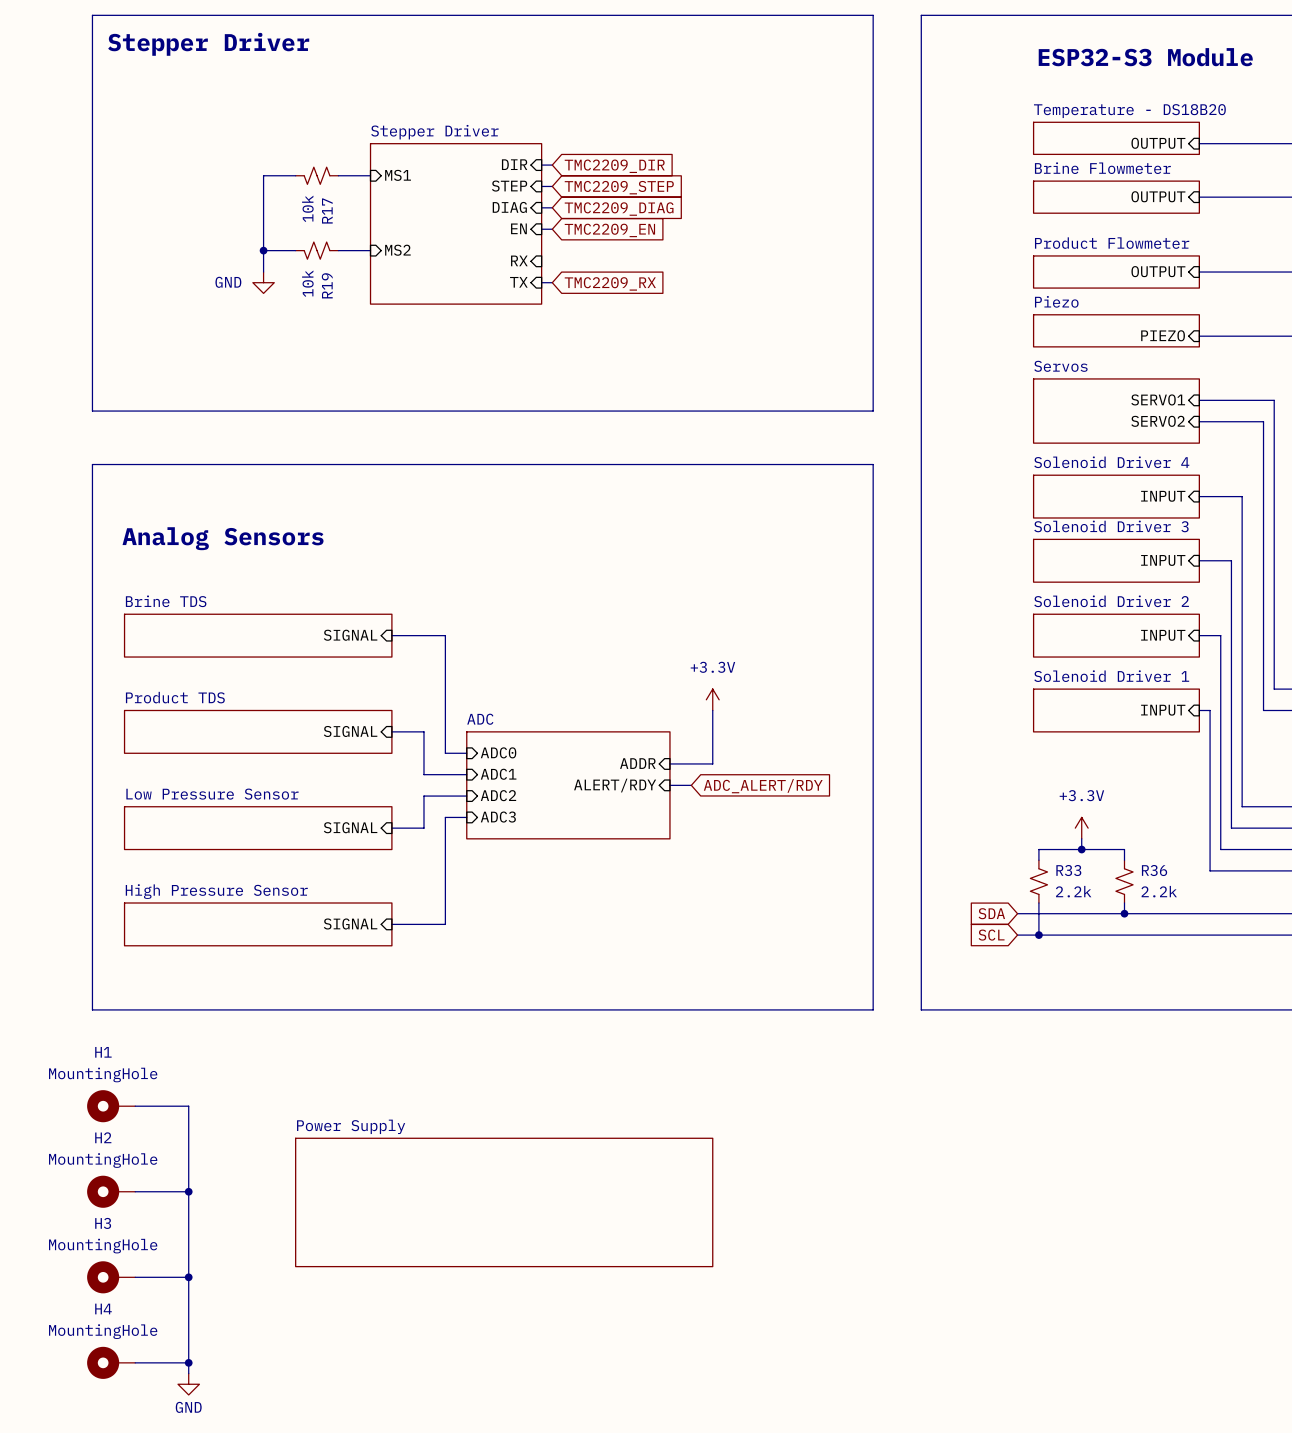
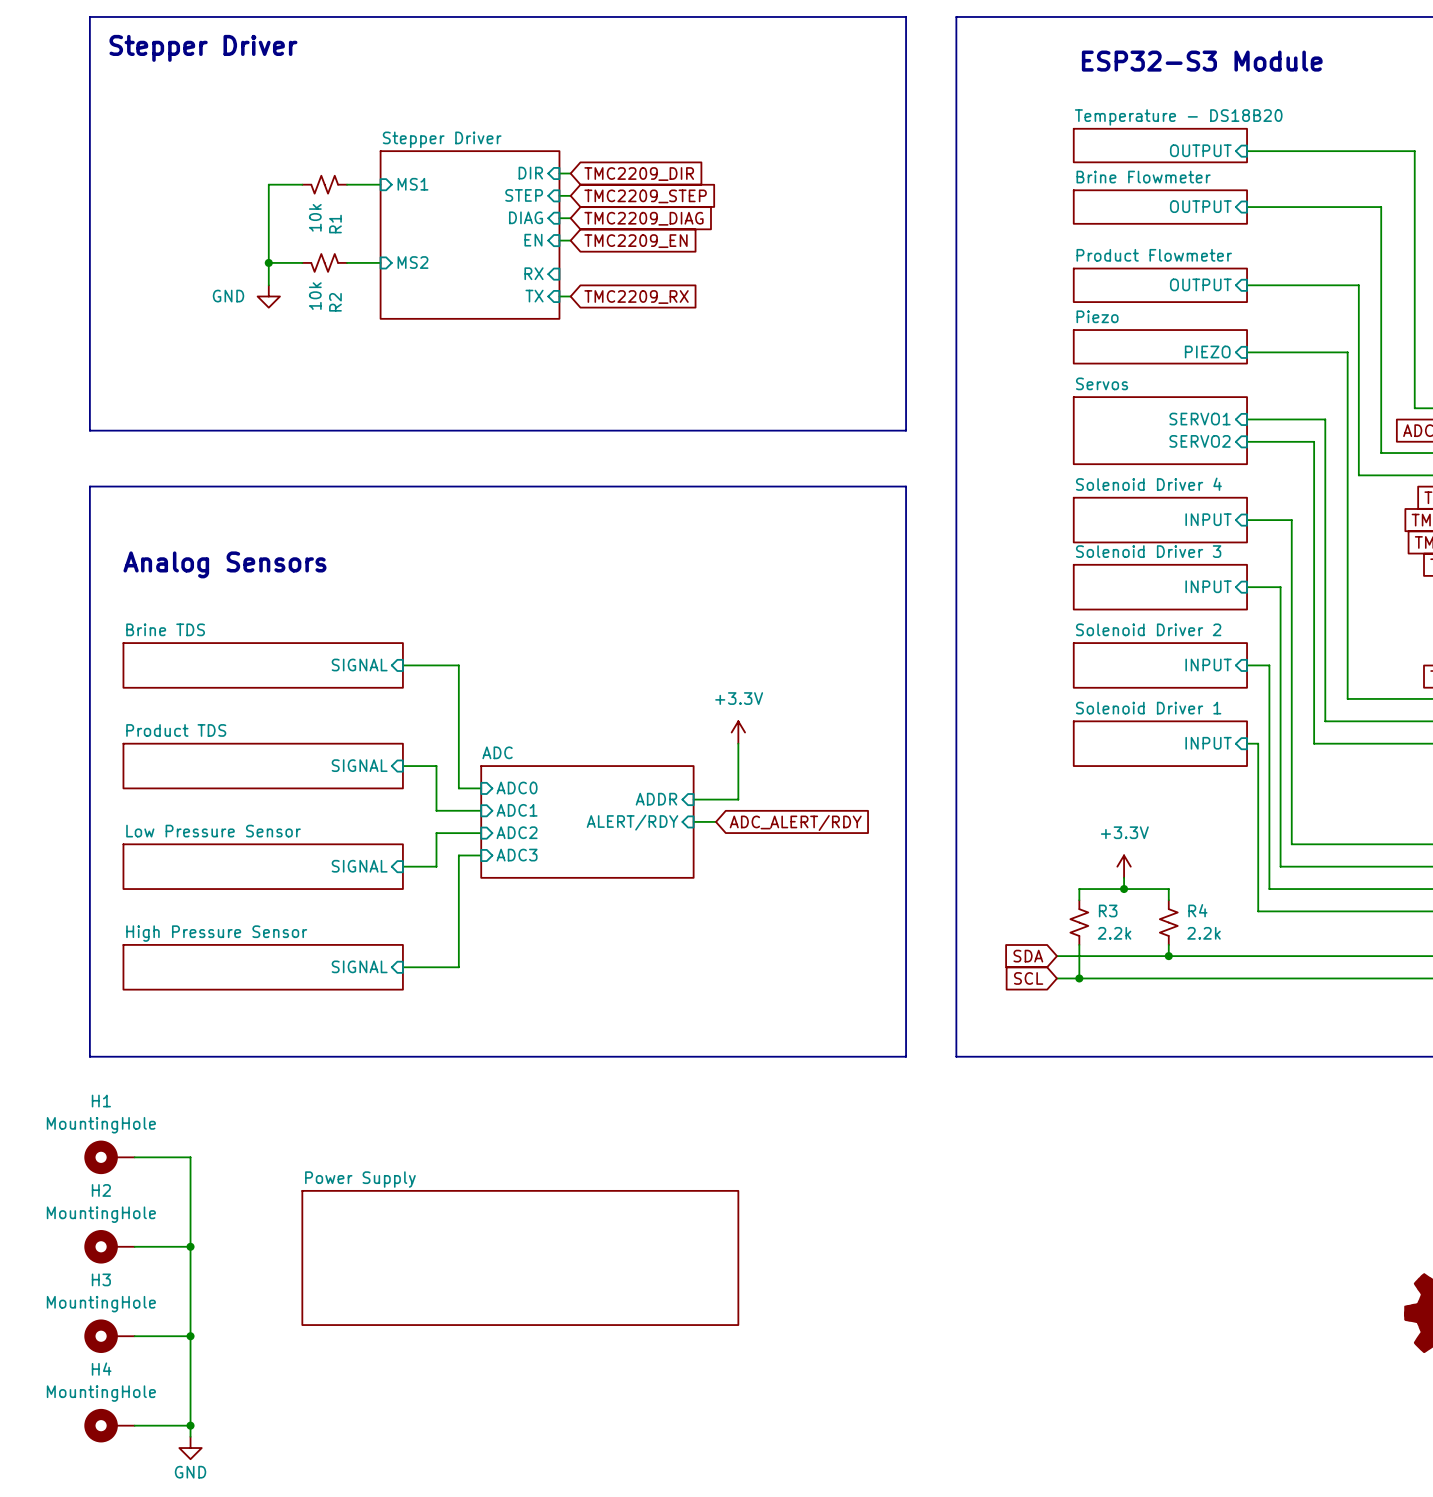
R17 name: R17 (327, 211) -> R1 (335, 224)
R19 name: R19 (327, 285) -> R2 (335, 302)
R33 name: R33 (1068, 870) -> R3 (1108, 910)
R36 name: R36 (1154, 870) -> R4 (1197, 910)

